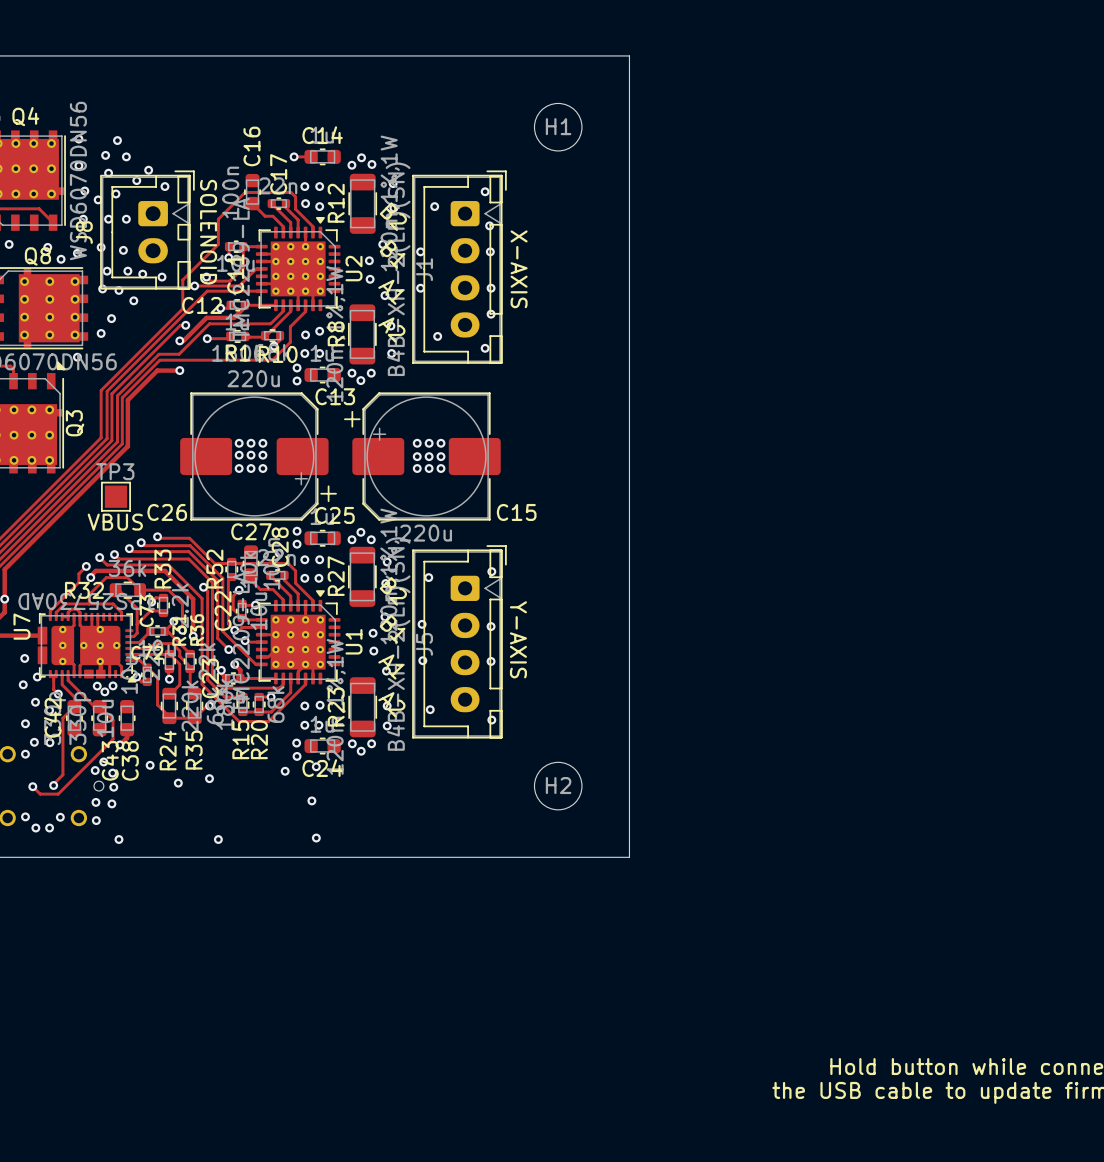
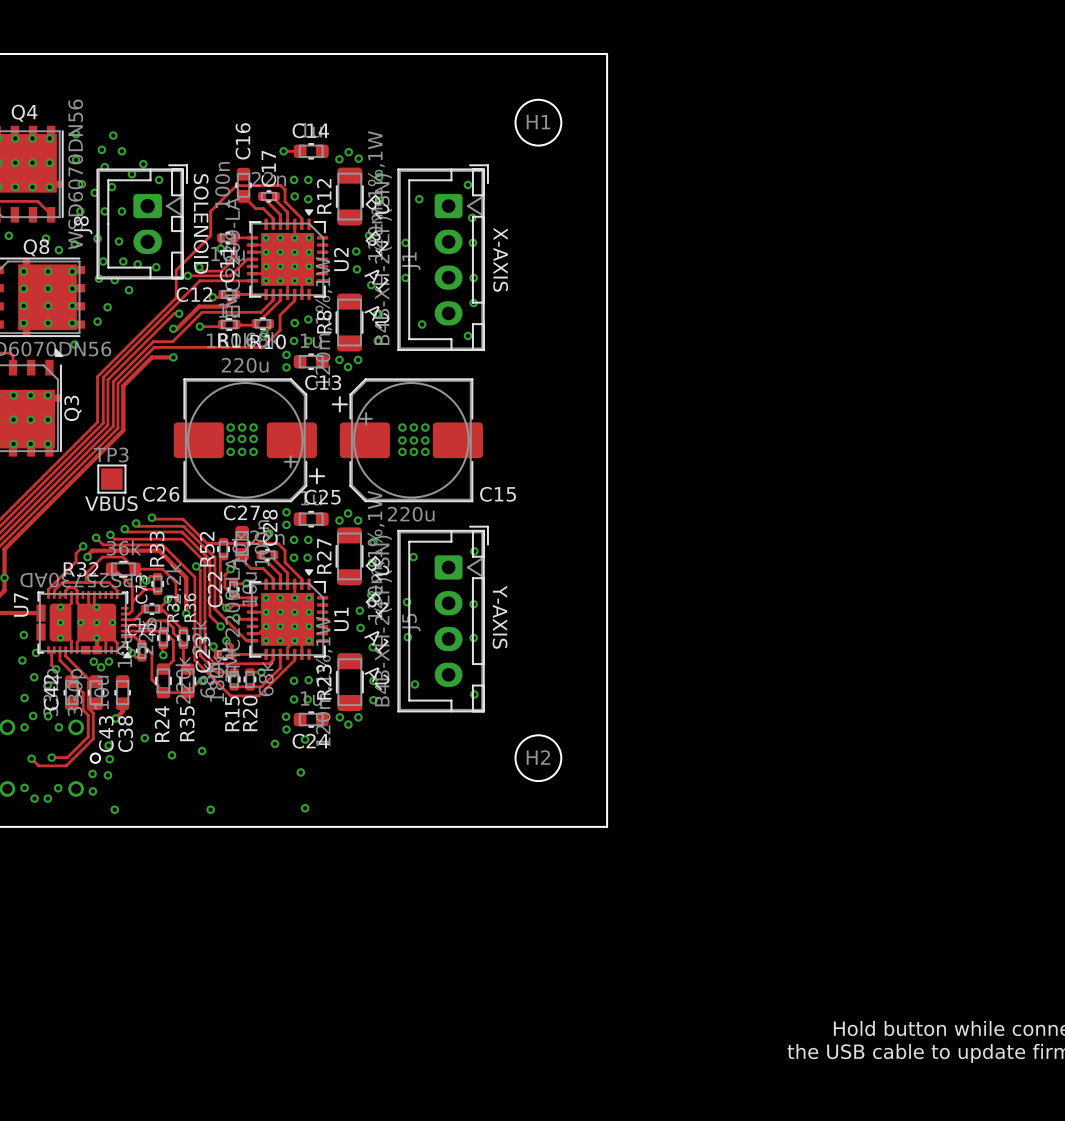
track: (74, 706) (62, 718) (62, 774) (53, 784) -> (71, 681) (83, 693) (83, 710) (88, 715) (88, 736) (67, 757) (51, 757)
track: (99, 706) (113, 720) (113, 739) (58, 794) -> (88, 681) (88, 708) (93, 713) (93, 738) (66, 765) (56, 765)
via: none -> (58, 727)
via: (103, 761) -> none
via: (95, 770) -> none

